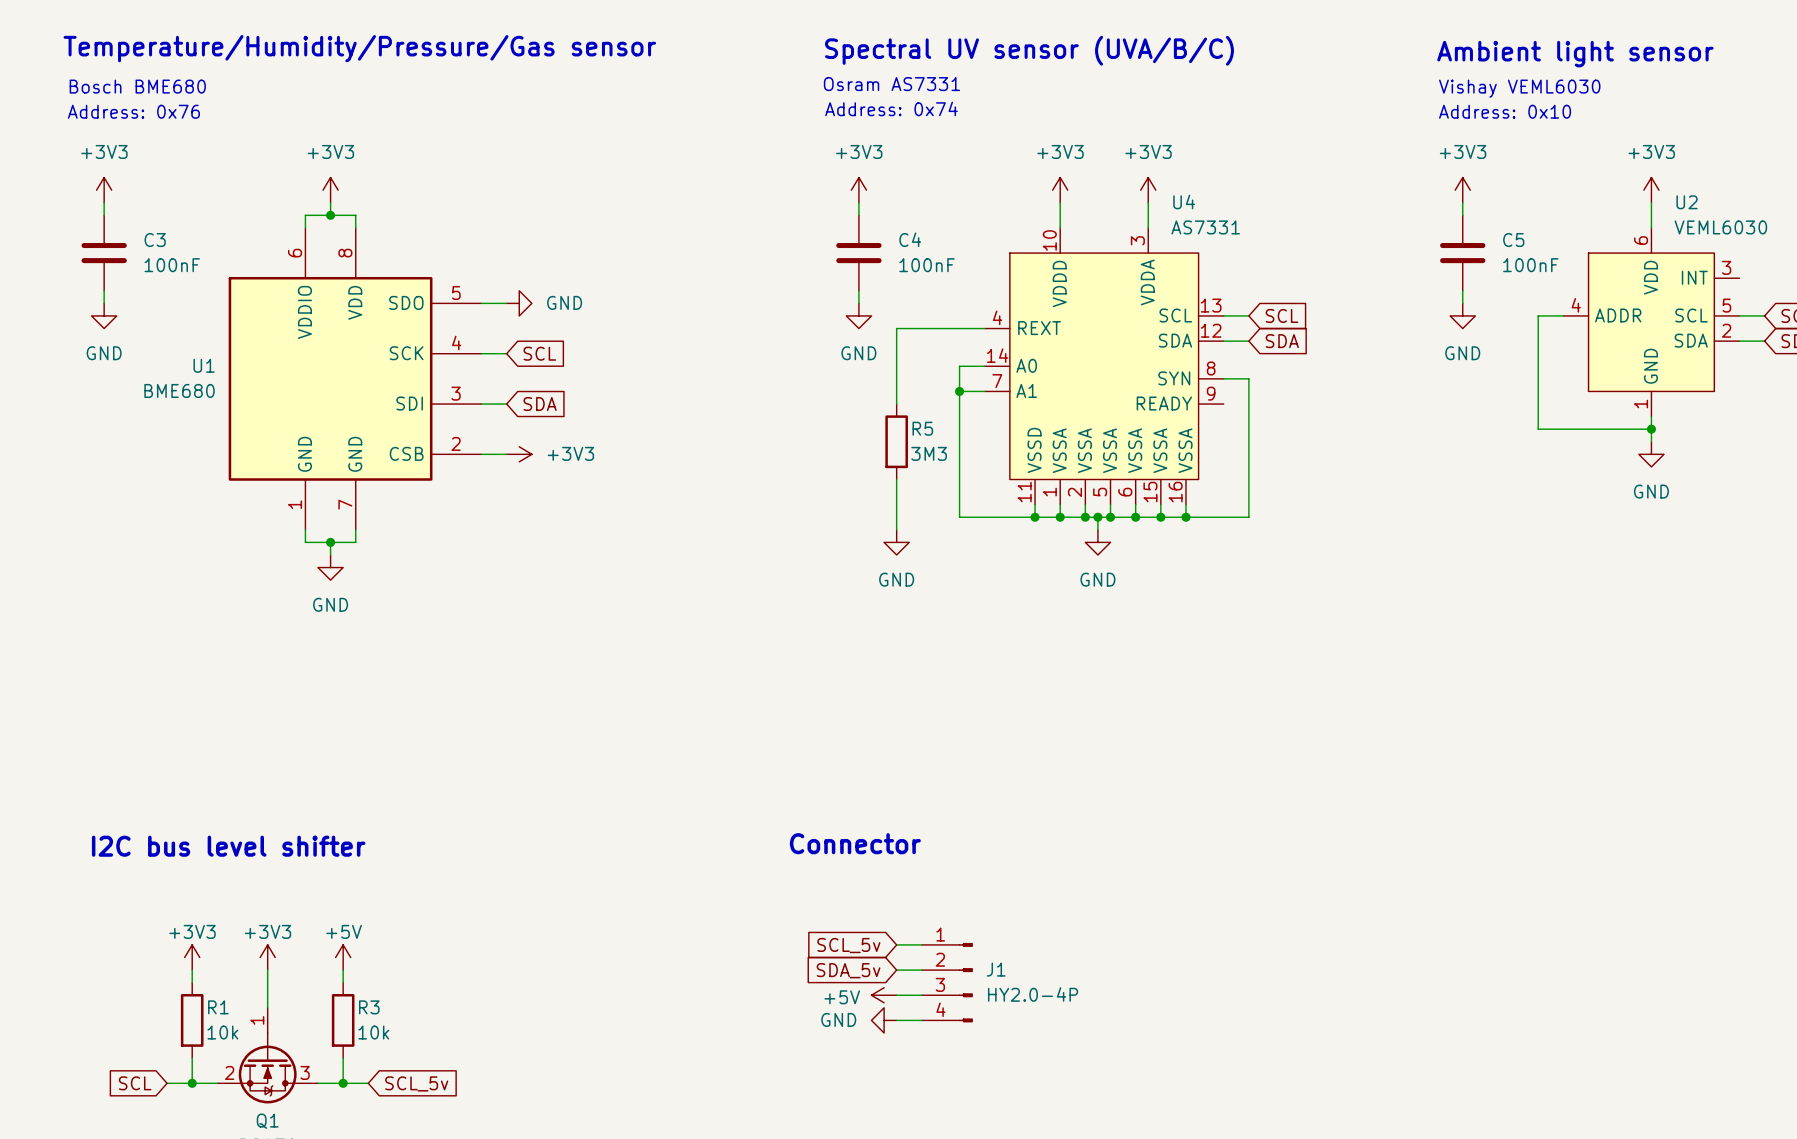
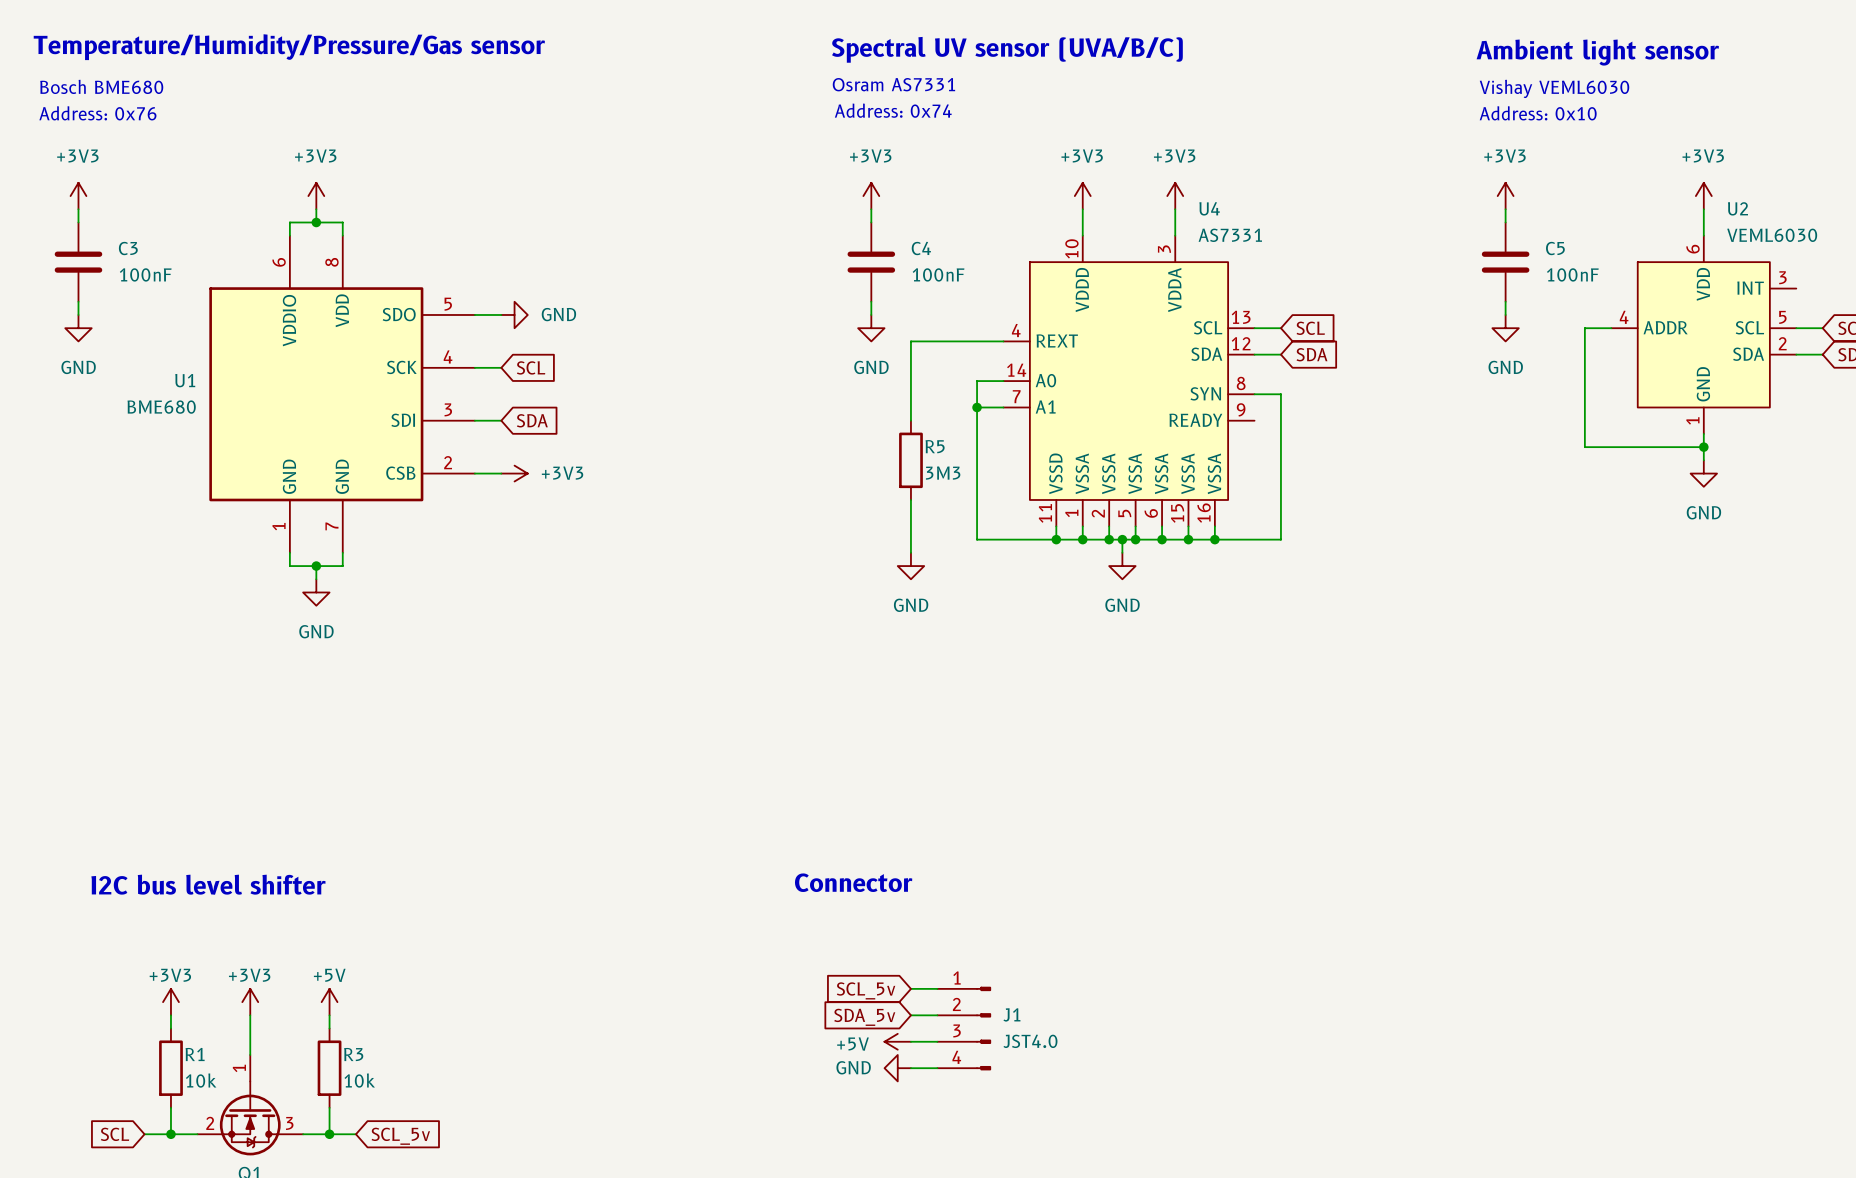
J1 value: HY2.0-4P (1033, 994) -> JST4.0 (1030, 1041)

